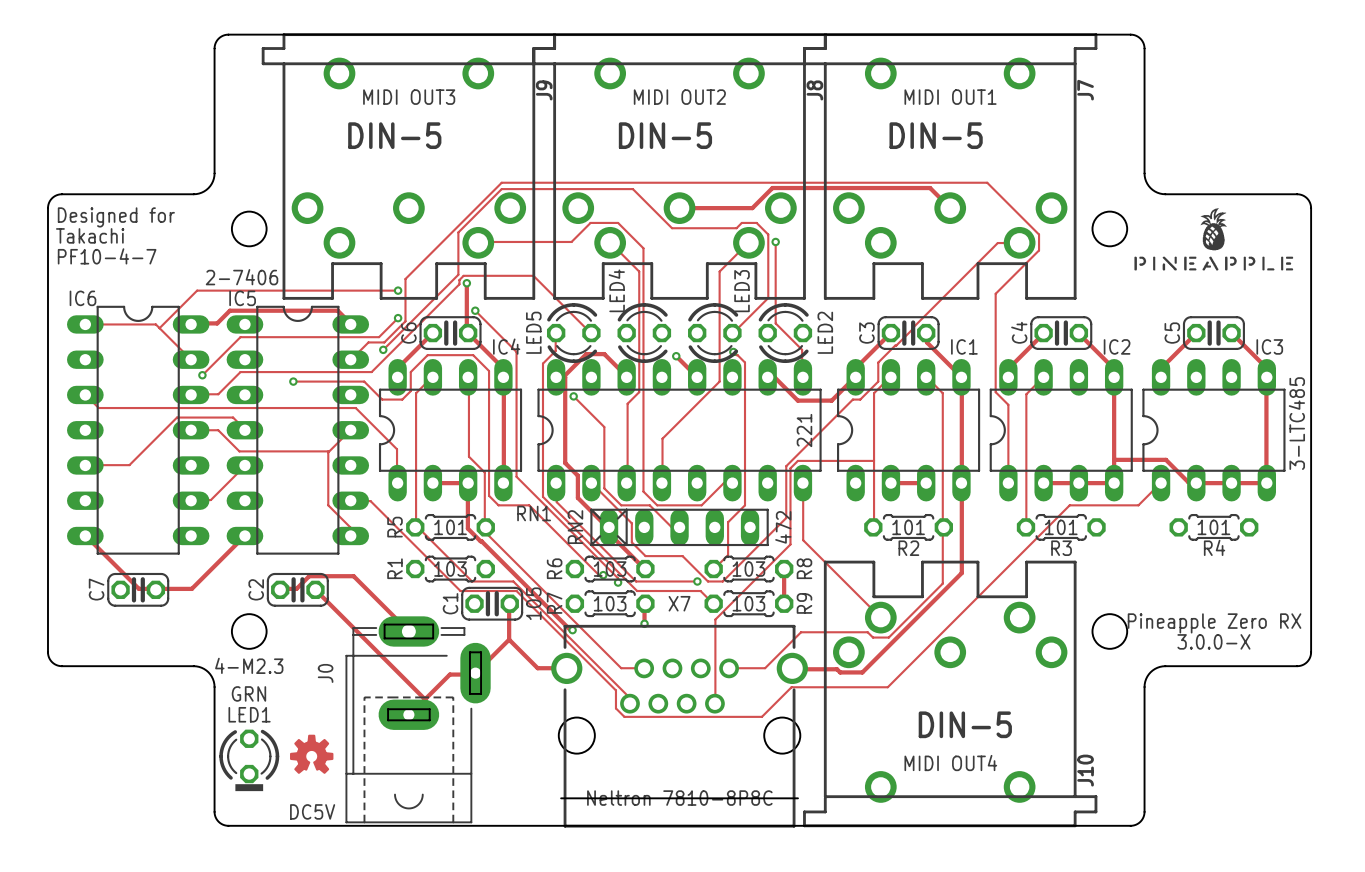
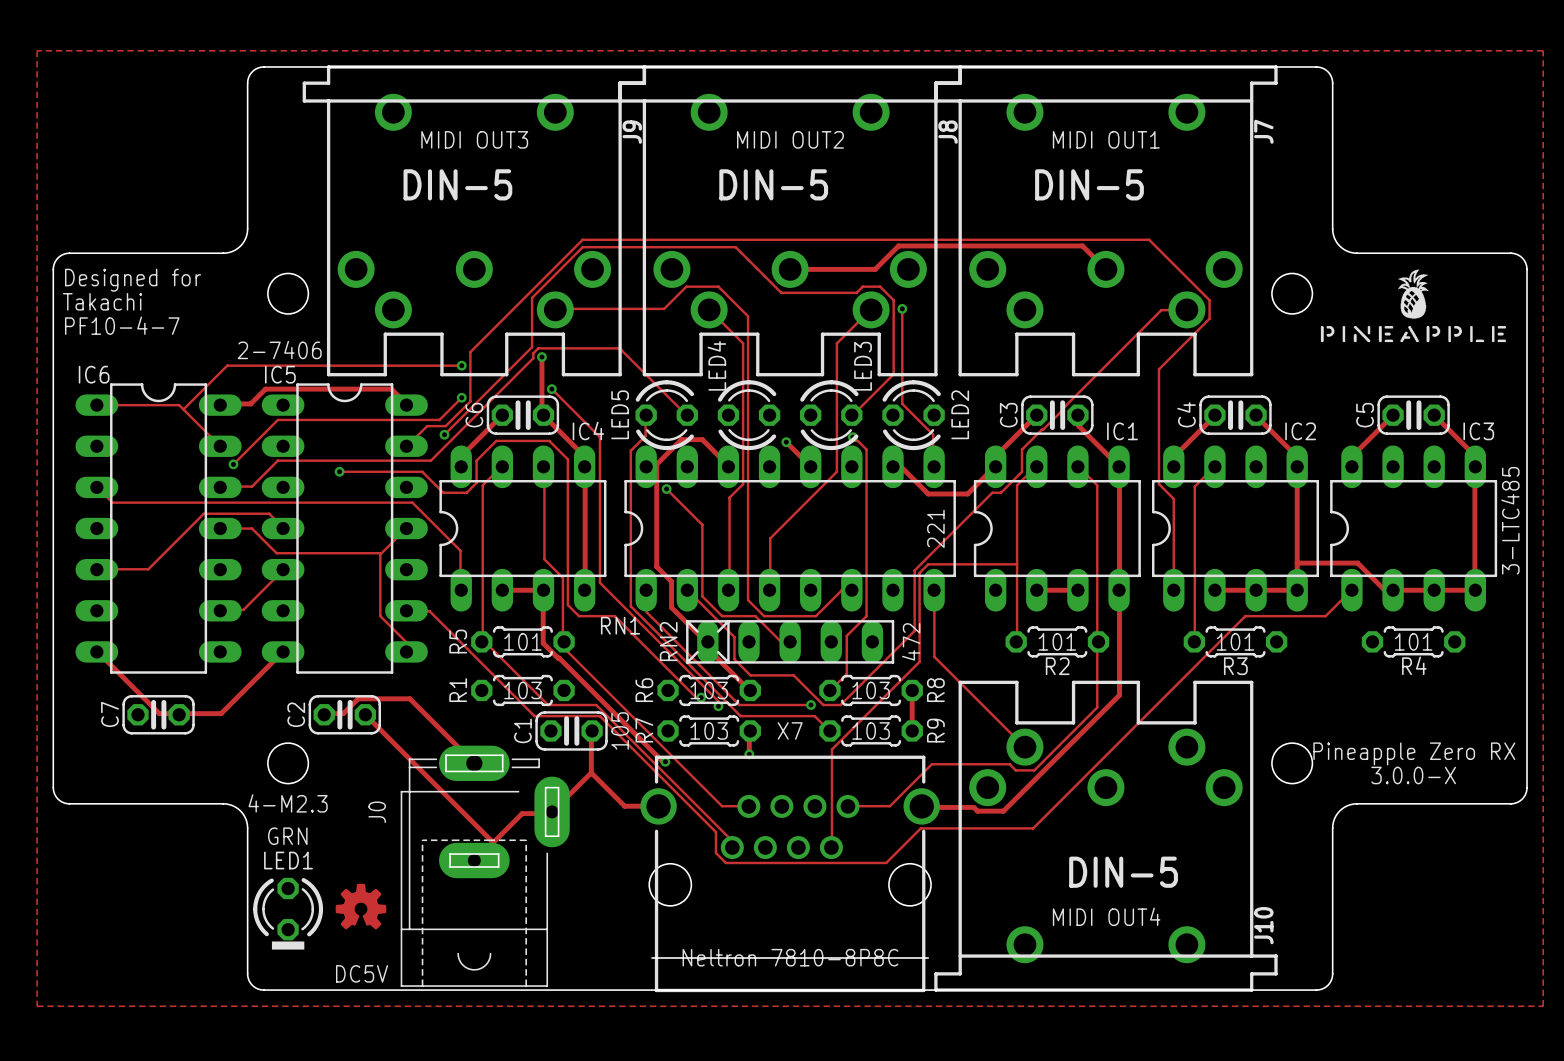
zone outline: none -> (37, 50) (1543, 50) (1543, 1006) (37, 1006) (37, 50)

